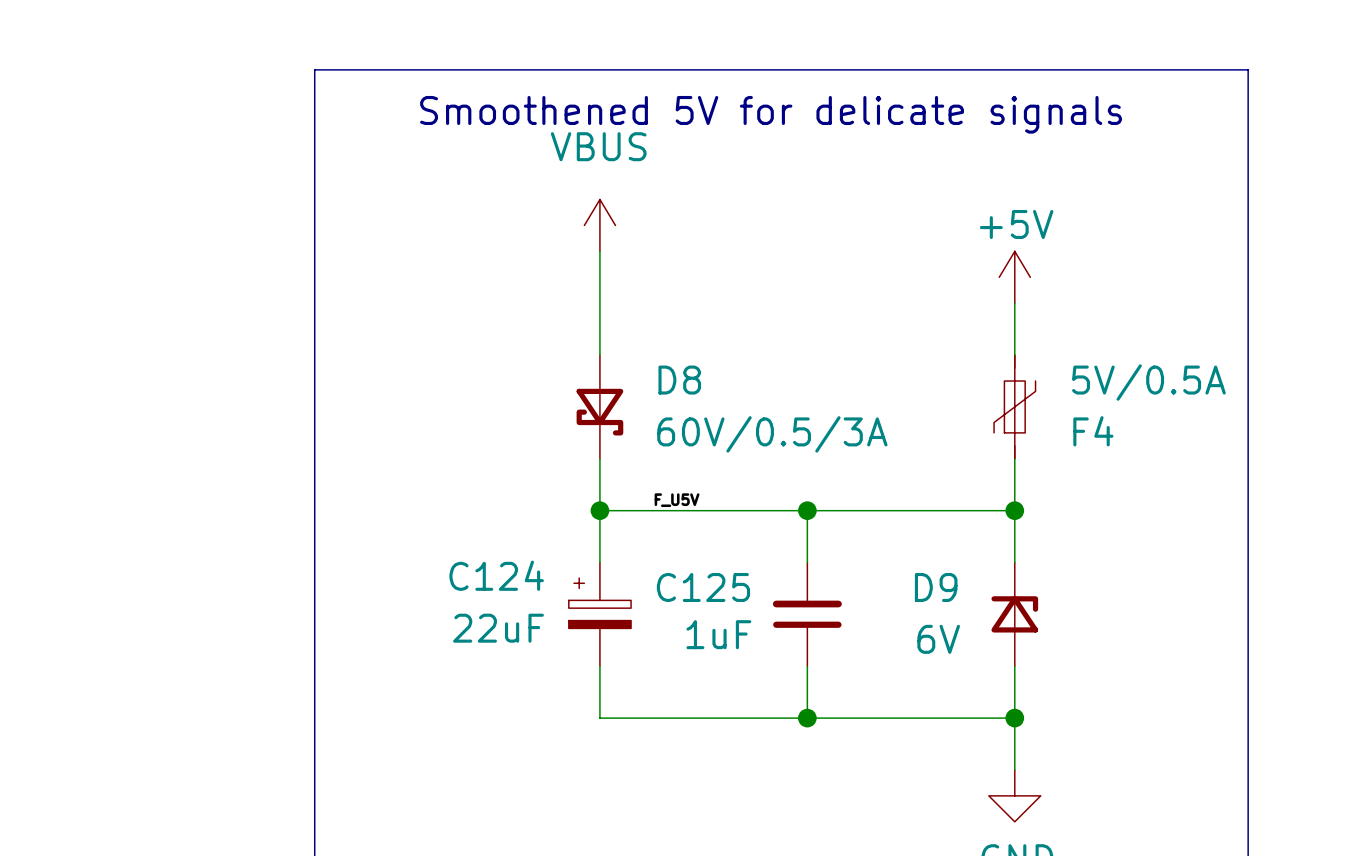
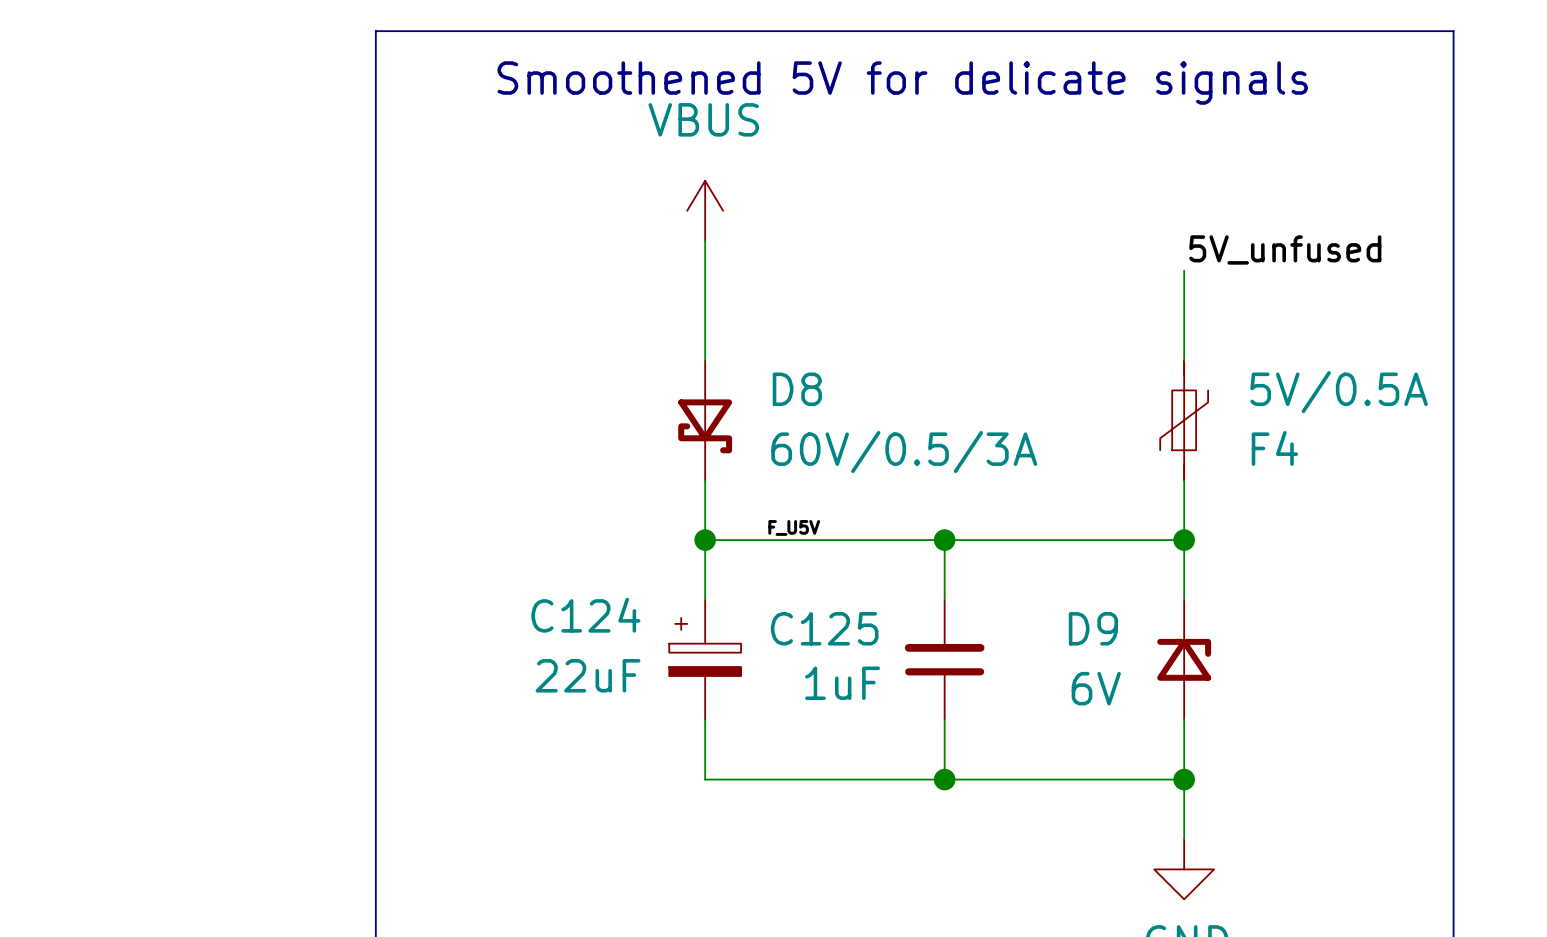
label: none -> 5V_unfused (1285, 249)
power symbol: +5V (1014, 277) -> none

